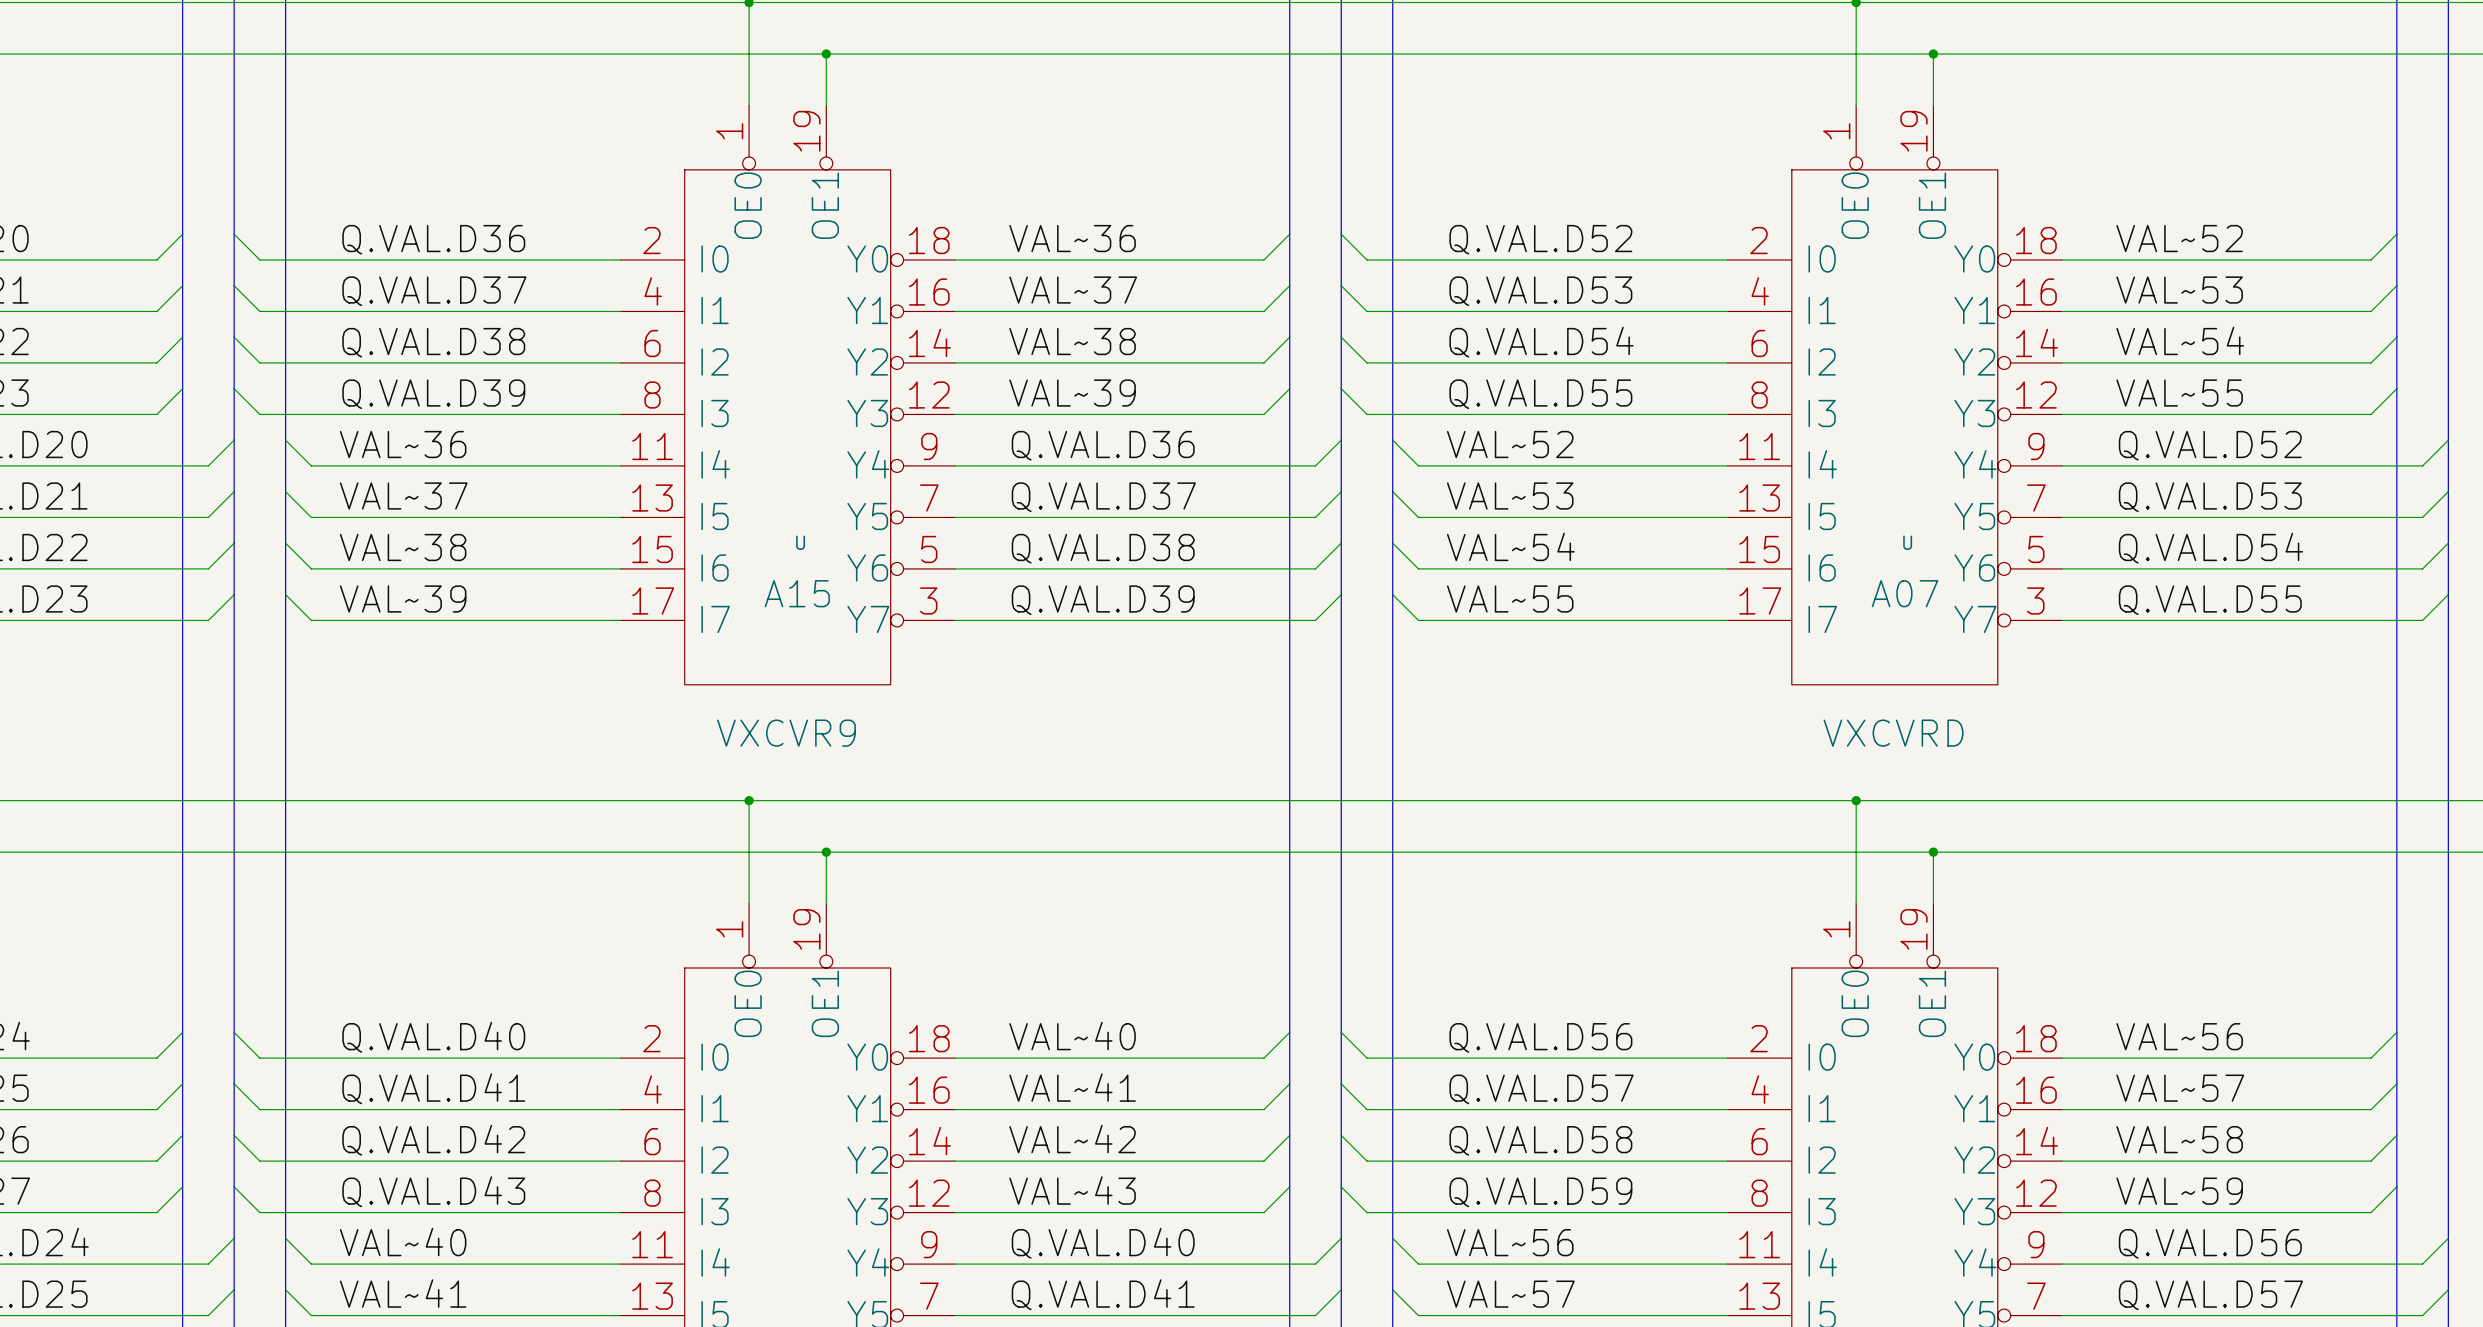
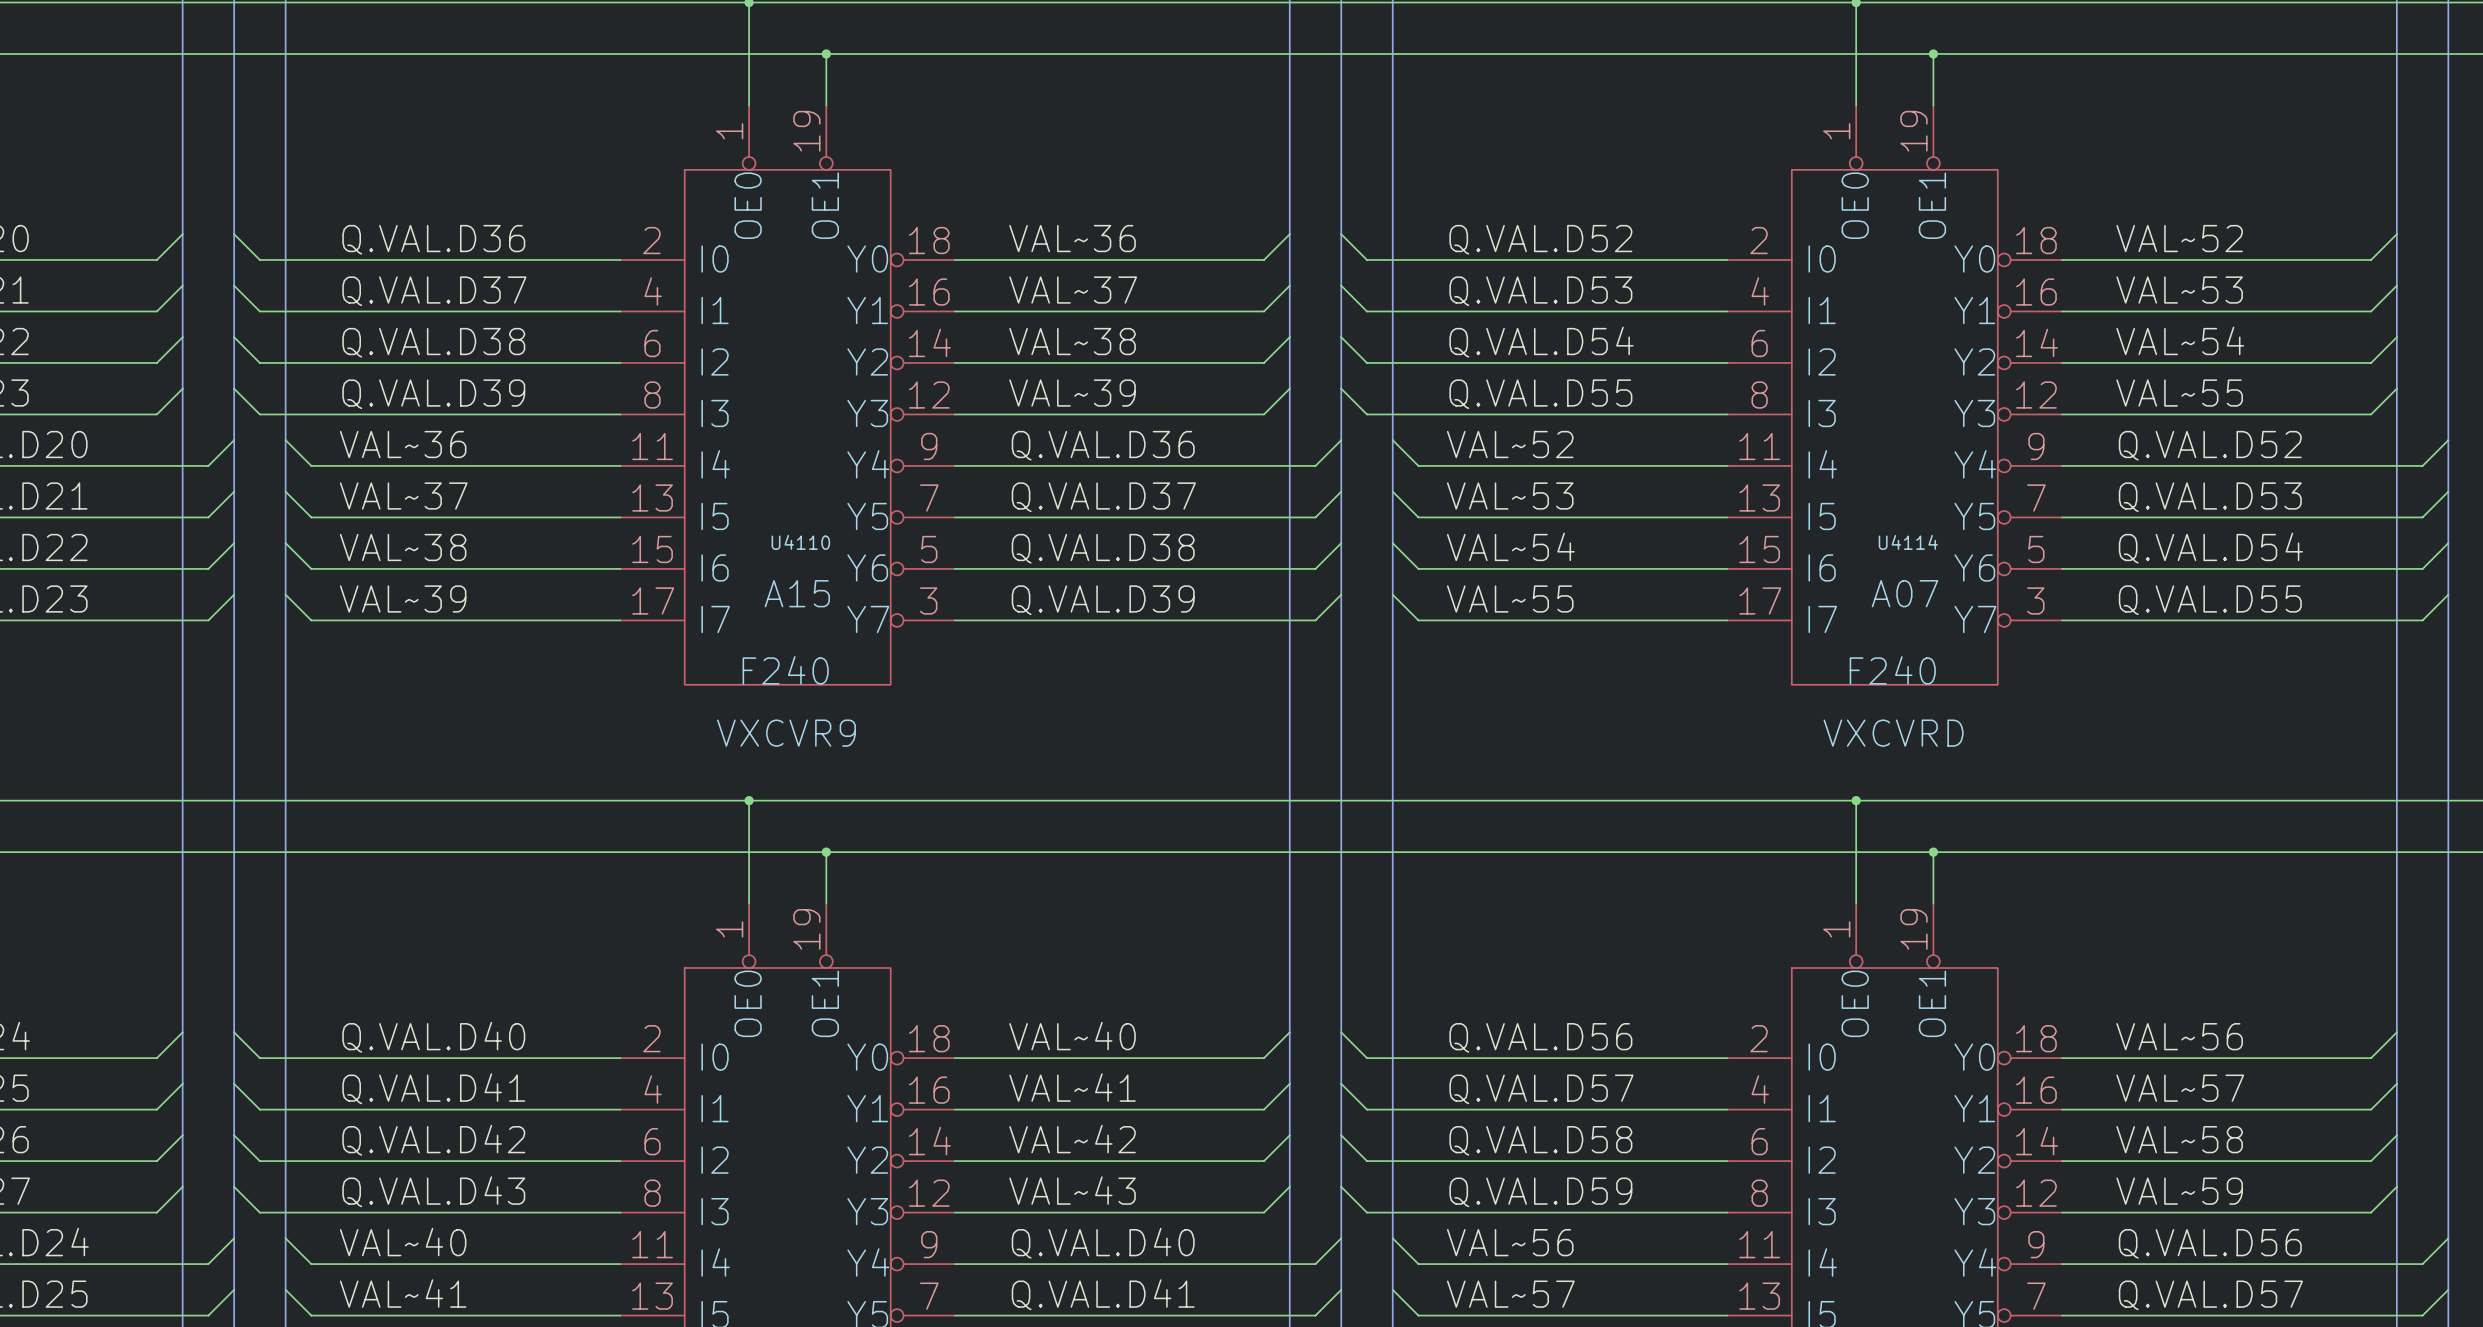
U name: U (800, 542) -> U4110 (800, 542)
U name: U (1907, 542) -> U4114 (1908, 542)
U value: none -> F240 (785, 670)
U value: none -> F240 (1892, 670)

